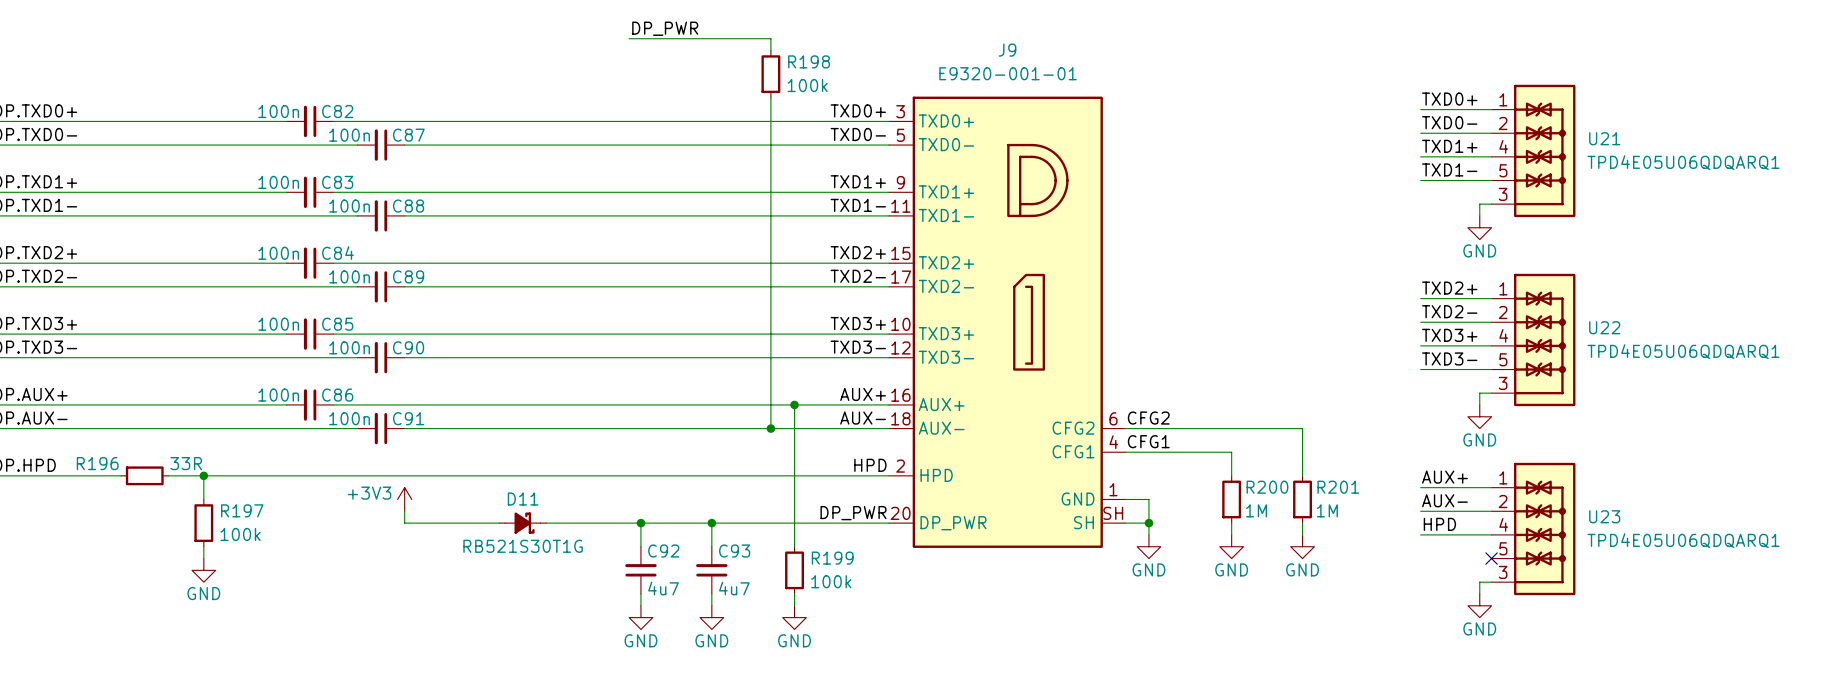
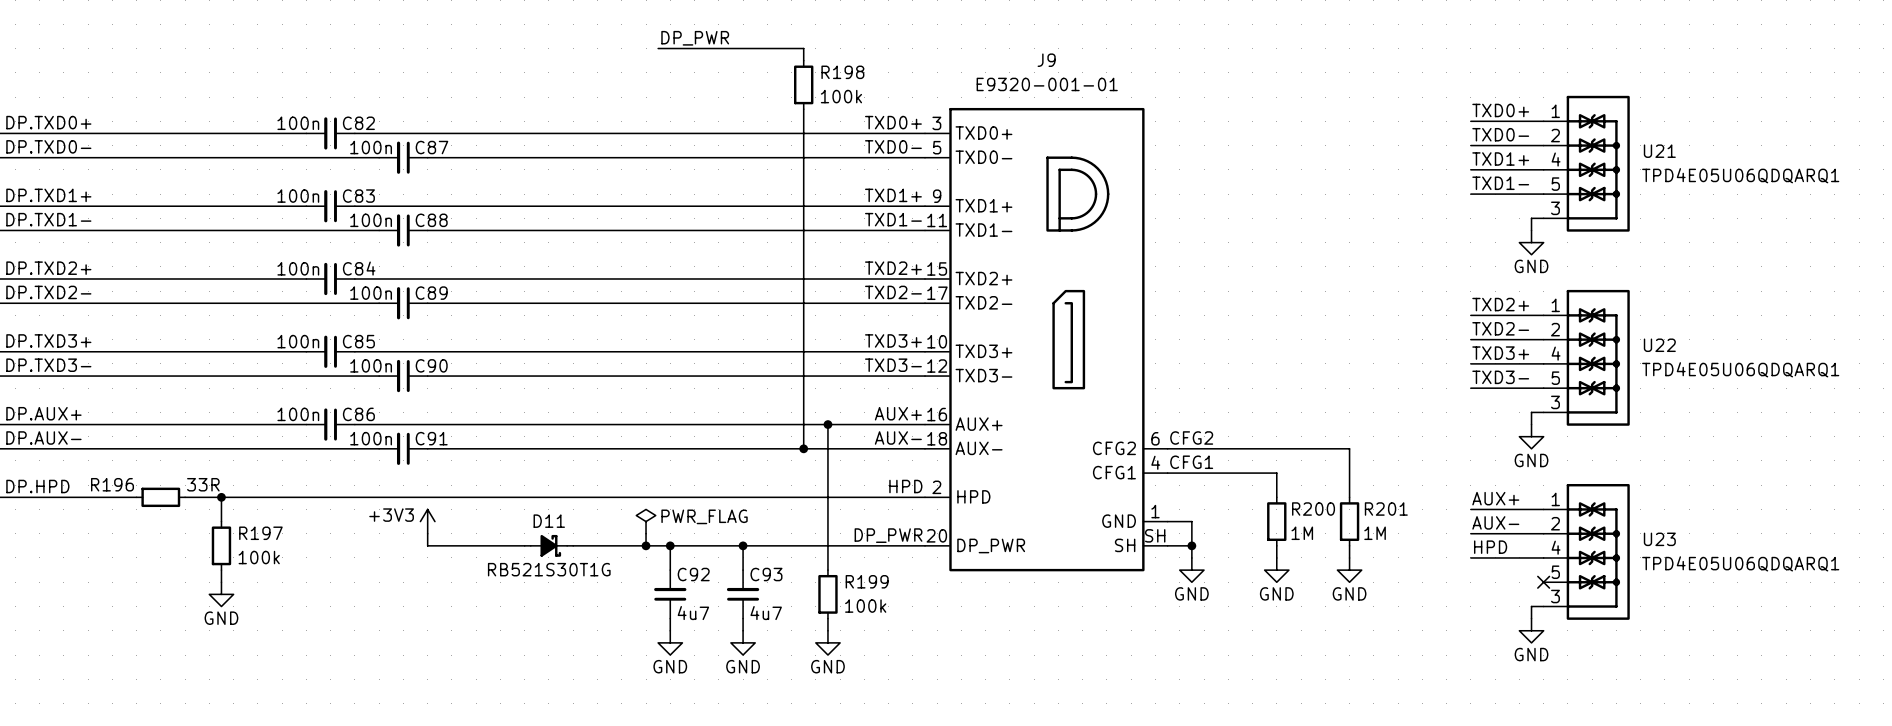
power symbol: none -> PWR_FLAG (646, 521)
wire: none -> (646, 533) (646, 545)
junction: none -> (646, 545)

